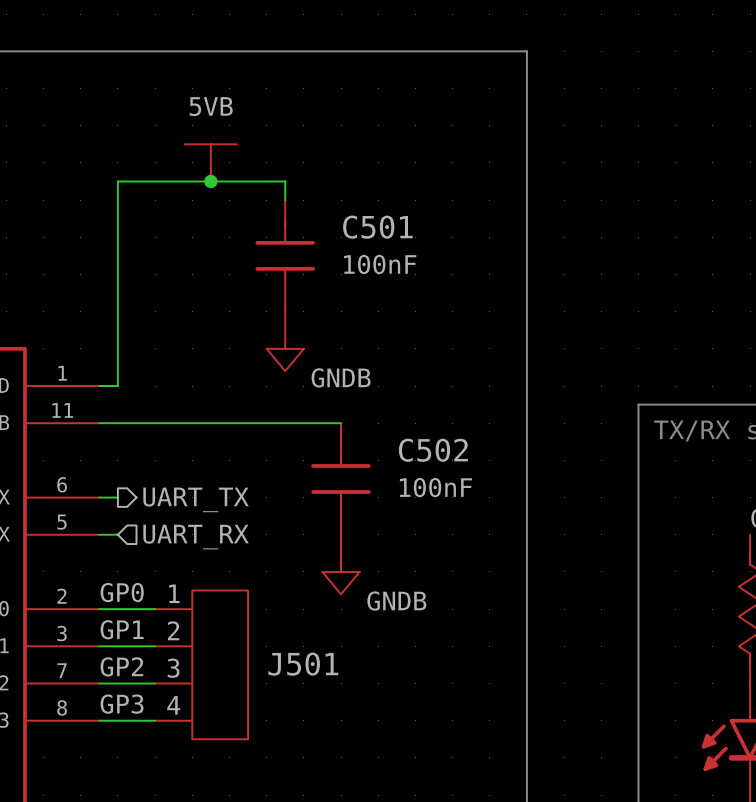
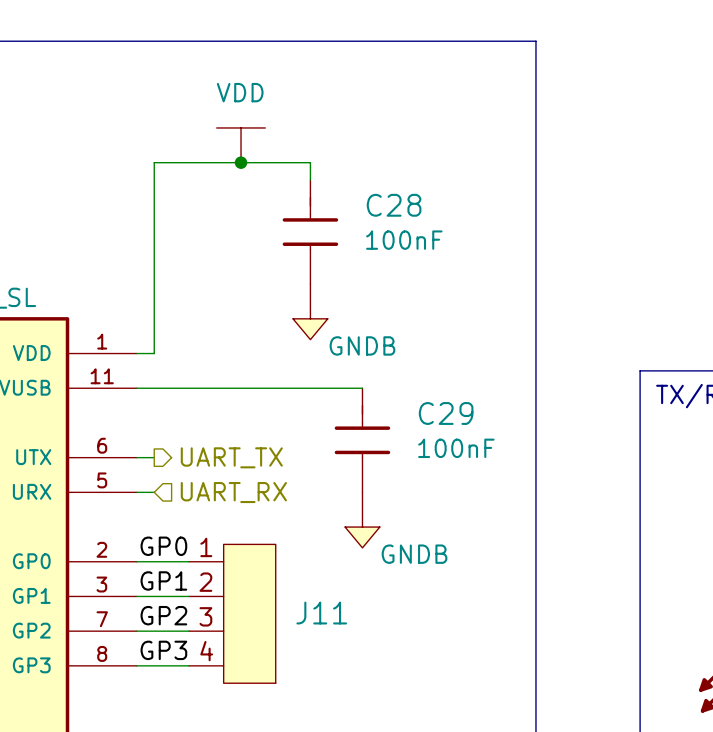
power symbol: 5VB (210, 162) -> VDD (241, 145)
C501 name: C501 (377, 227) -> C28 (394, 205)
C502 name: C502 (433, 450) -> C29 (446, 413)
J501 name: J501 (303, 664) -> J11 (321, 613)

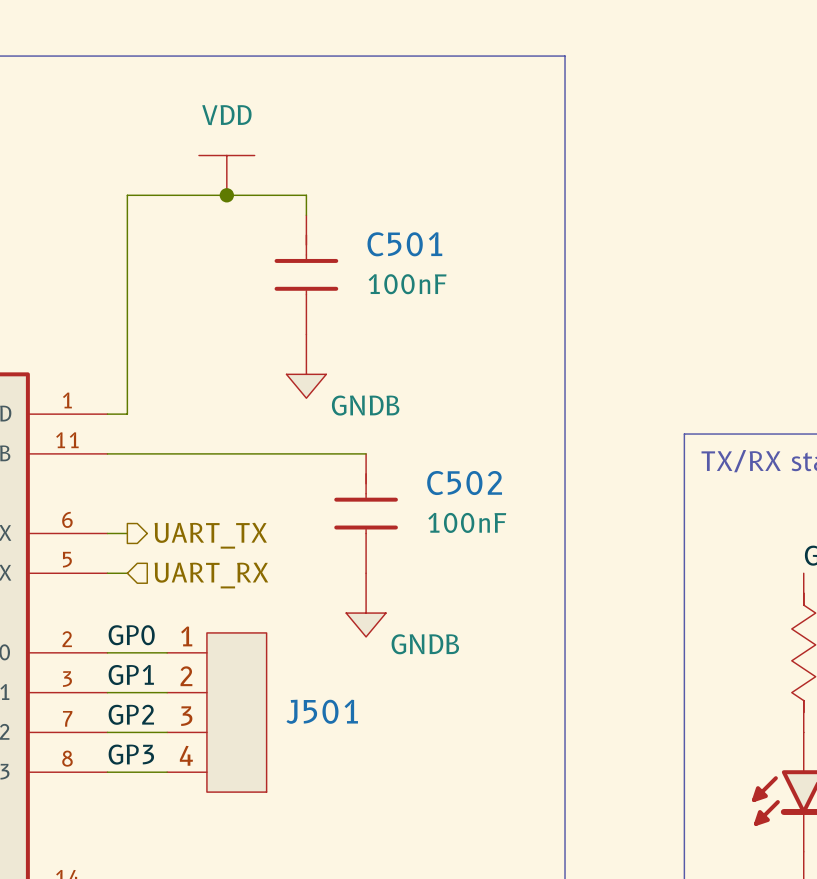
C28 name: C28 (394, 205) -> C501 (404, 244)
C29 name: C29 (446, 413) -> C502 (464, 483)
J11 name: J11 (321, 613) -> J501 (322, 711)

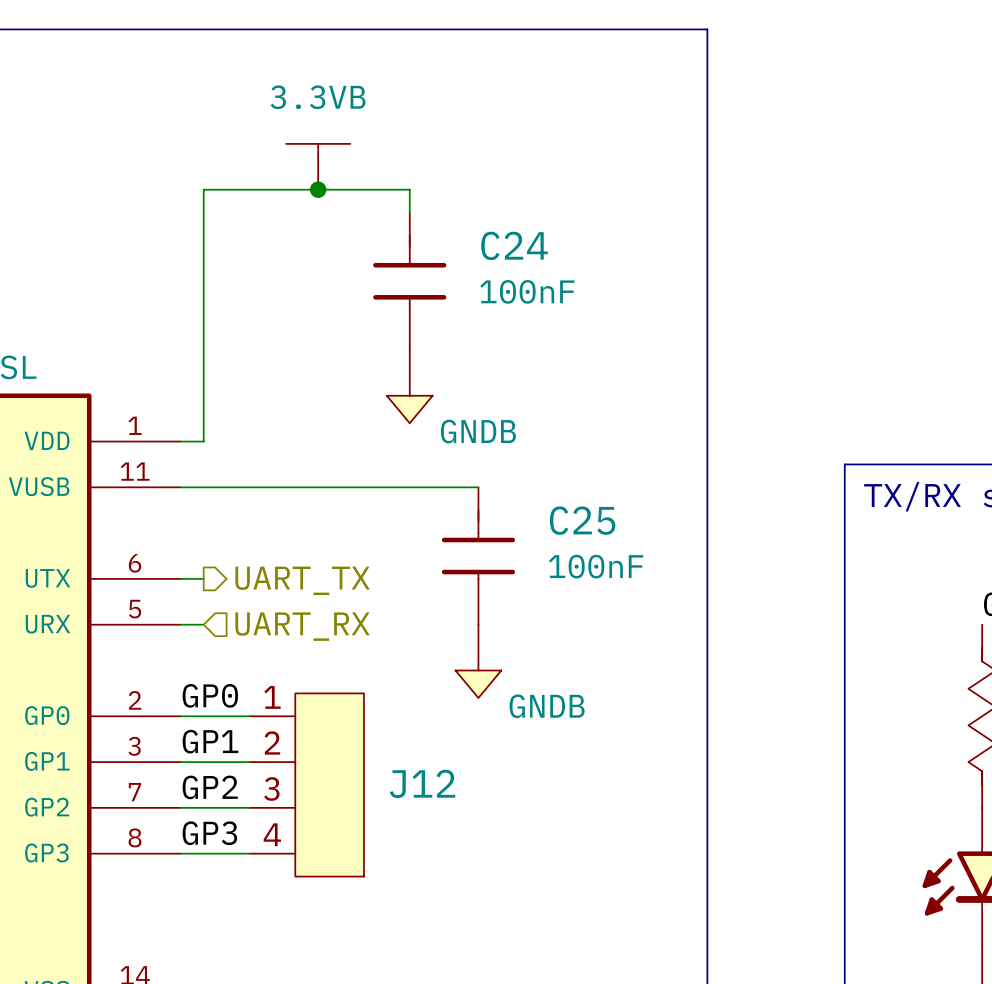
power symbol: VDD (226, 175) -> 3.3VB (318, 166)
C501 name: C501 (404, 244) -> C24 (514, 245)
C502 name: C502 (464, 483) -> C25 (582, 520)
J501 name: J501 (322, 711) -> J12 (422, 783)

